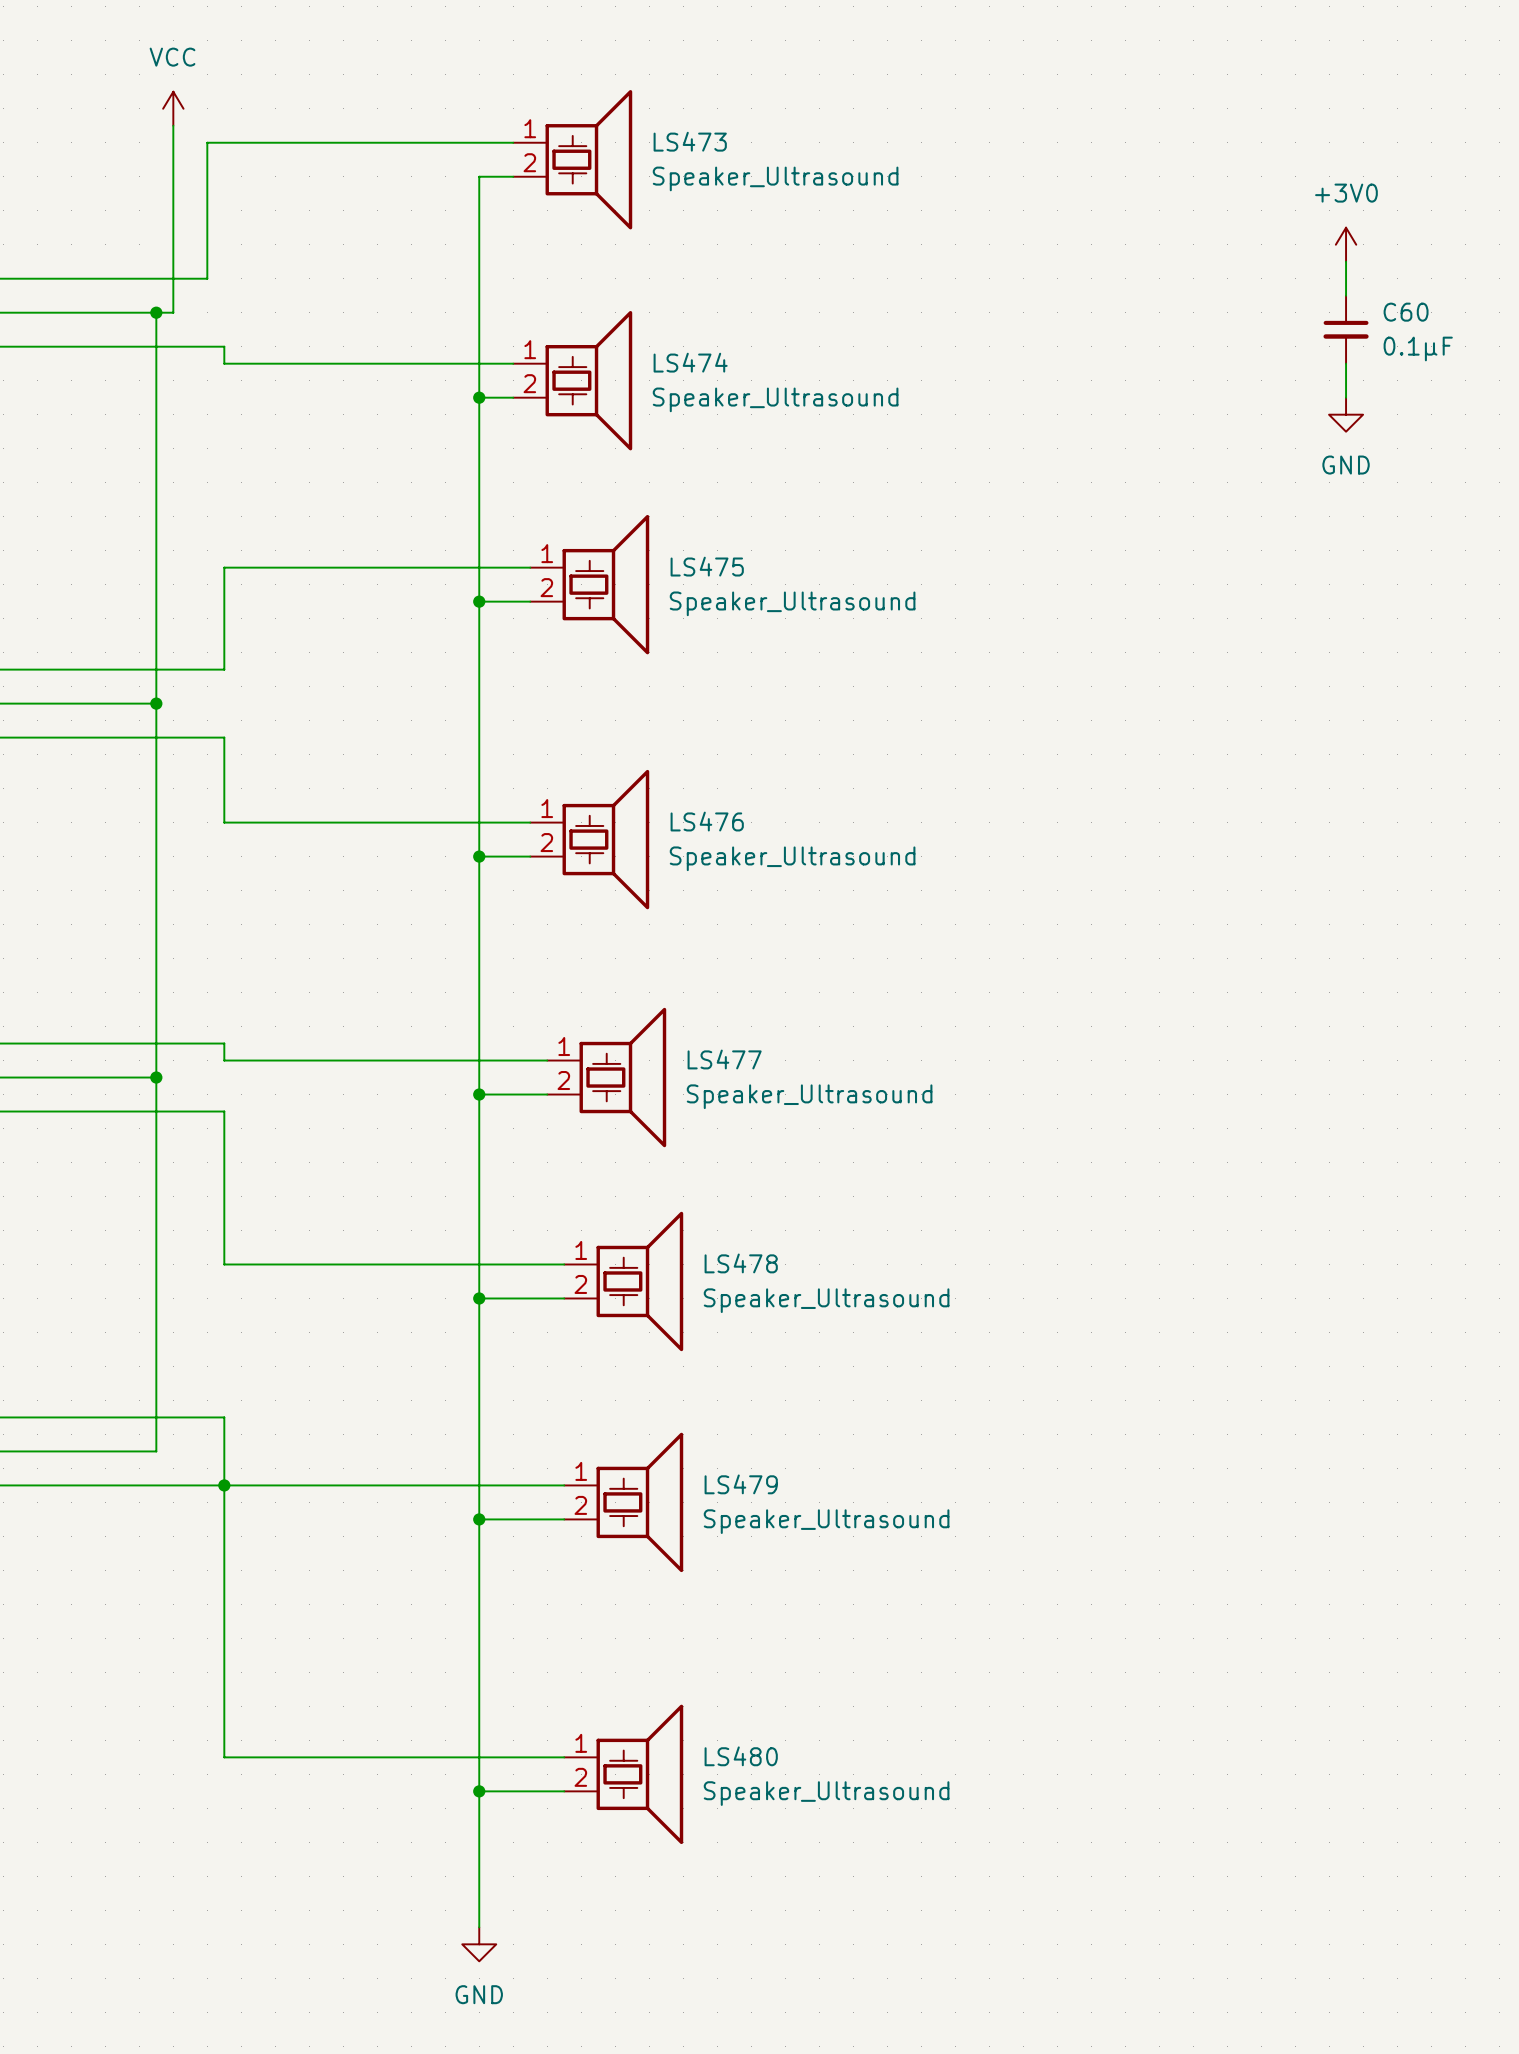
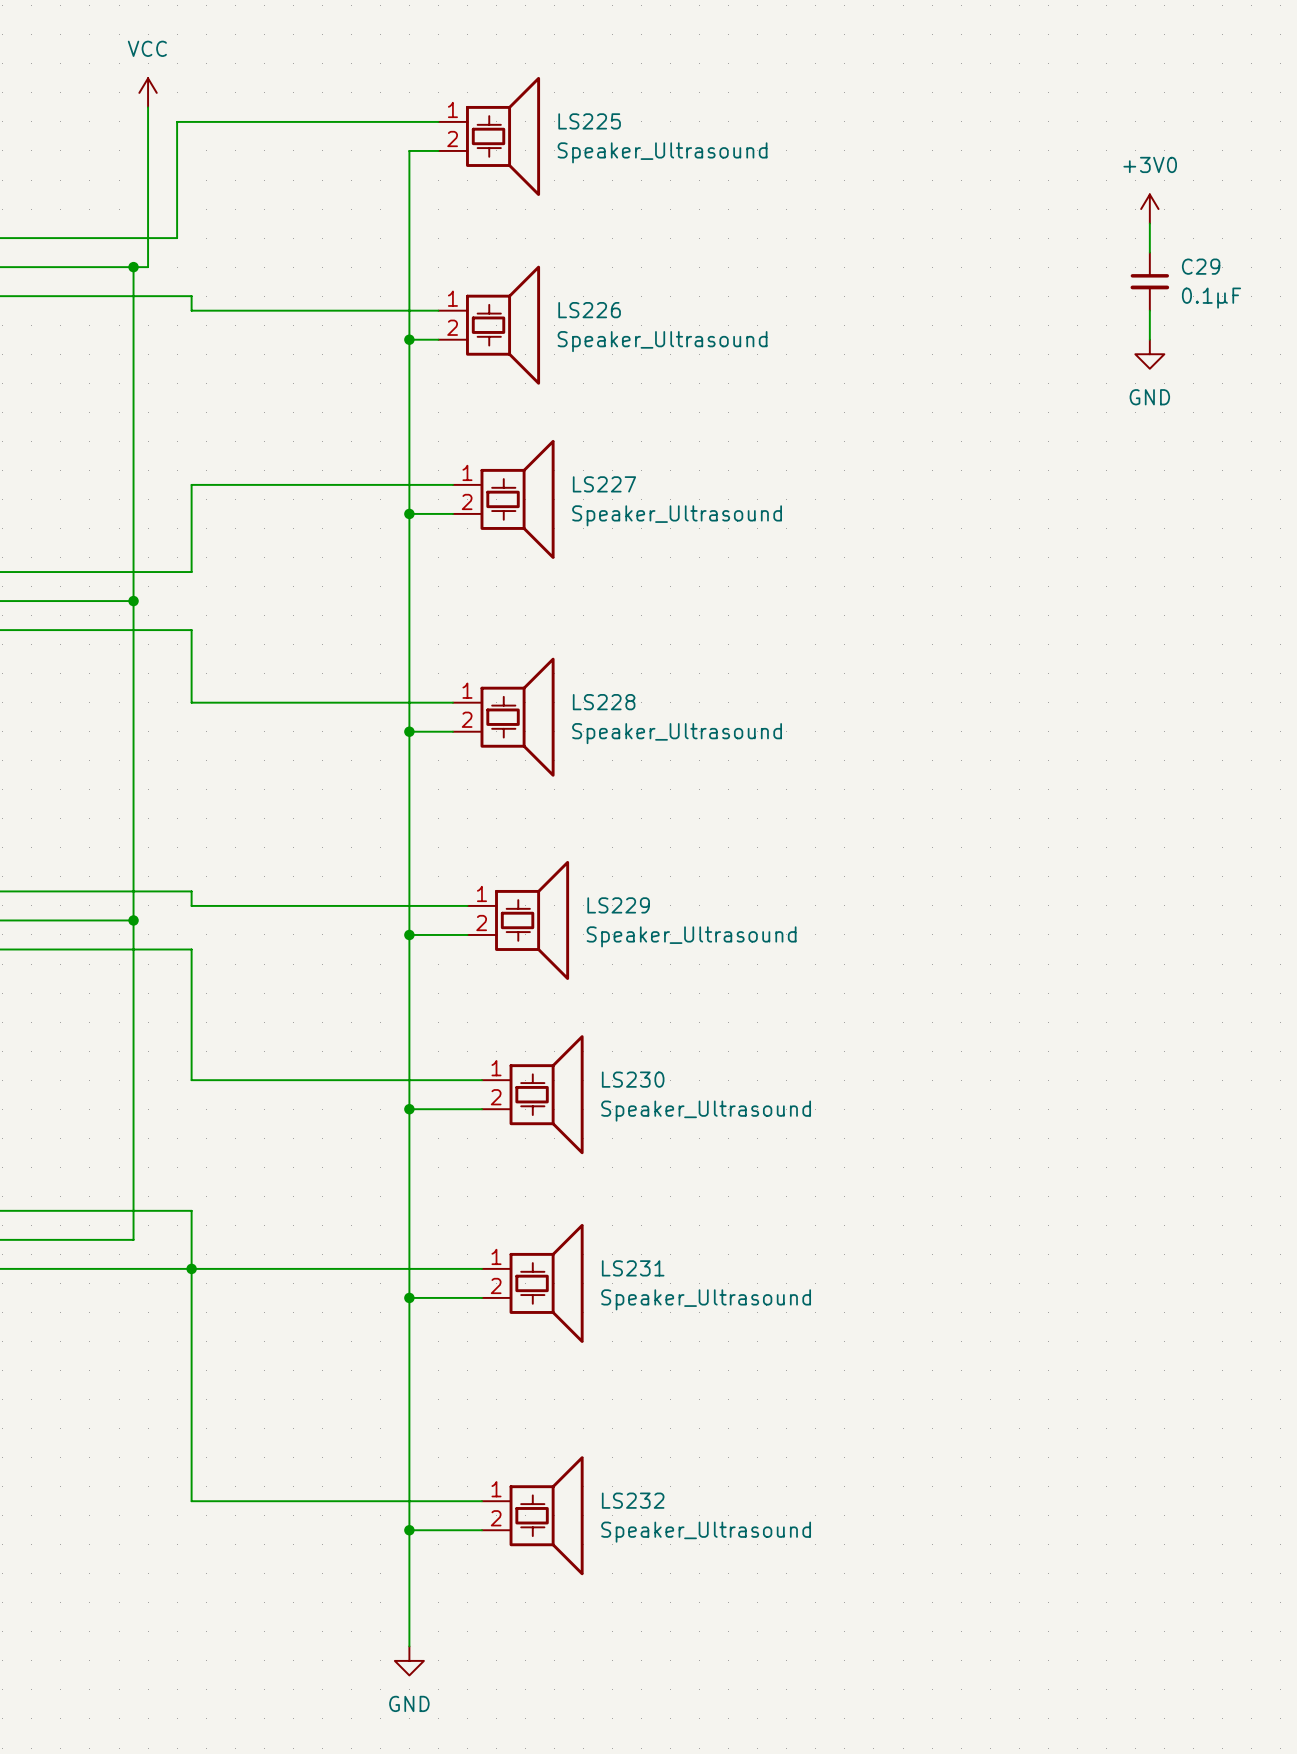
LS473 name: LS473 (690, 141) -> LS225 (589, 121)
C60 name: C60 (1406, 312) -> C29 (1201, 266)
LS474 name: LS474 (690, 362) -> LS226 (589, 310)
LS475 name: LS475 (707, 566) -> LS227 (604, 484)
LS476 name: LS476 (707, 821) -> LS228 (604, 702)
LS477 name: LS477 (724, 1059) -> LS229 (618, 905)
LS478 name: LS478 (741, 1263) -> LS230 (633, 1079)
LS479 name: LS479 (741, 1484) -> LS231 (633, 1268)
LS480 name: LS480 (741, 1756) -> LS232 (633, 1500)

